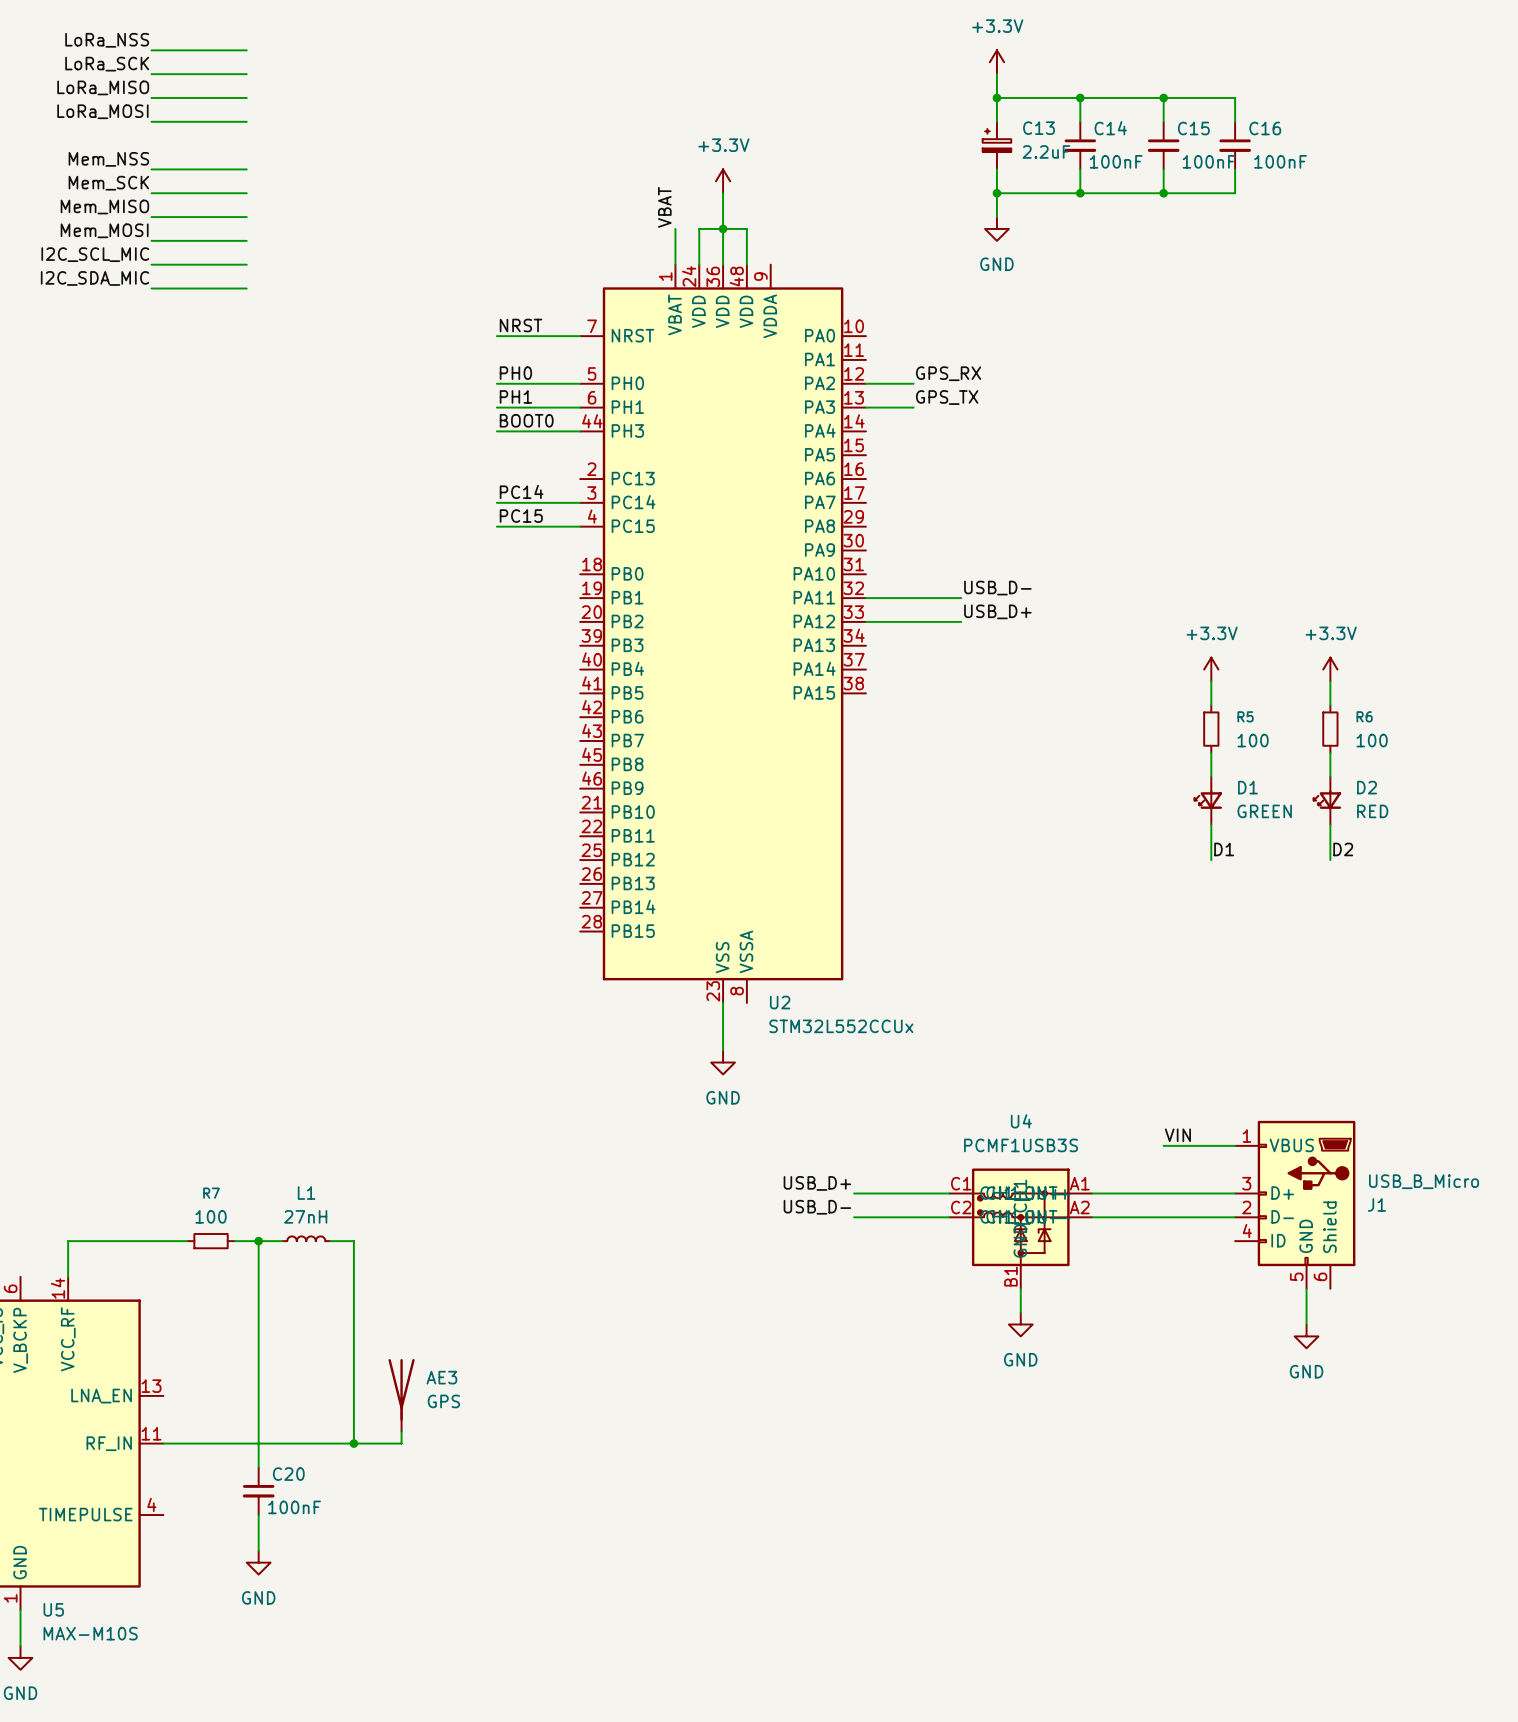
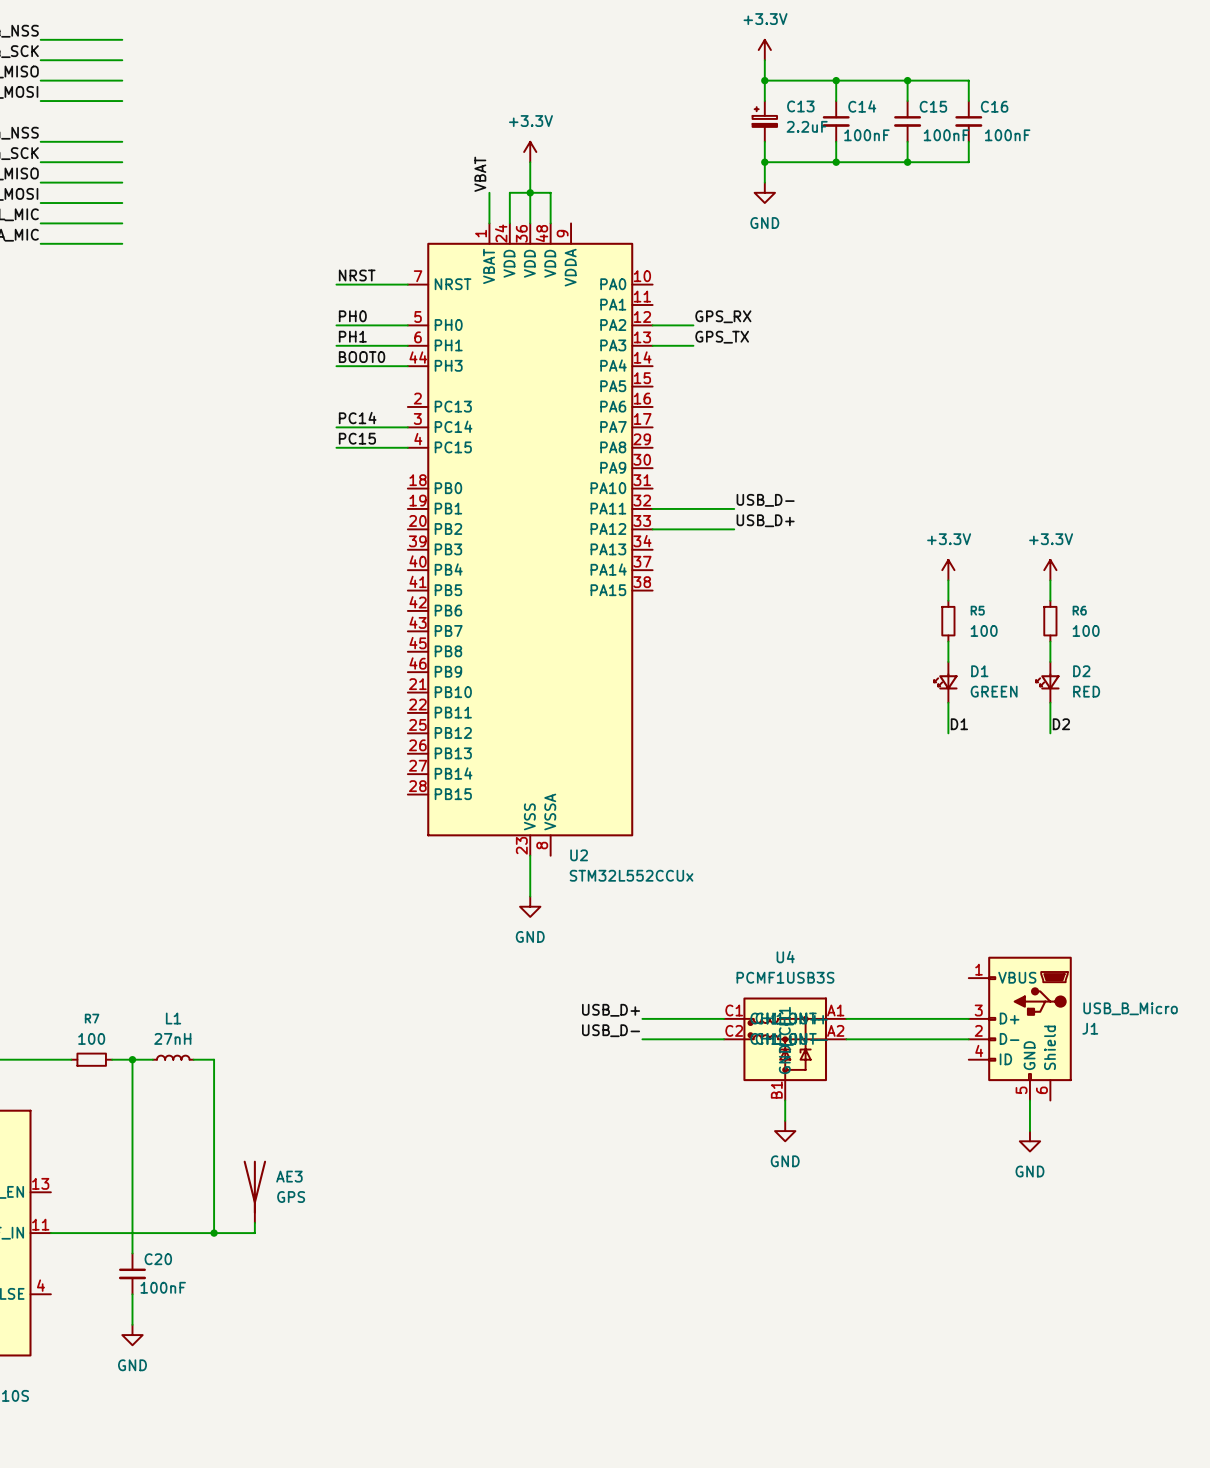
label: VIN (1177, 1135) -> none
wire: (1163, 1145) (1235, 1145) -> none

